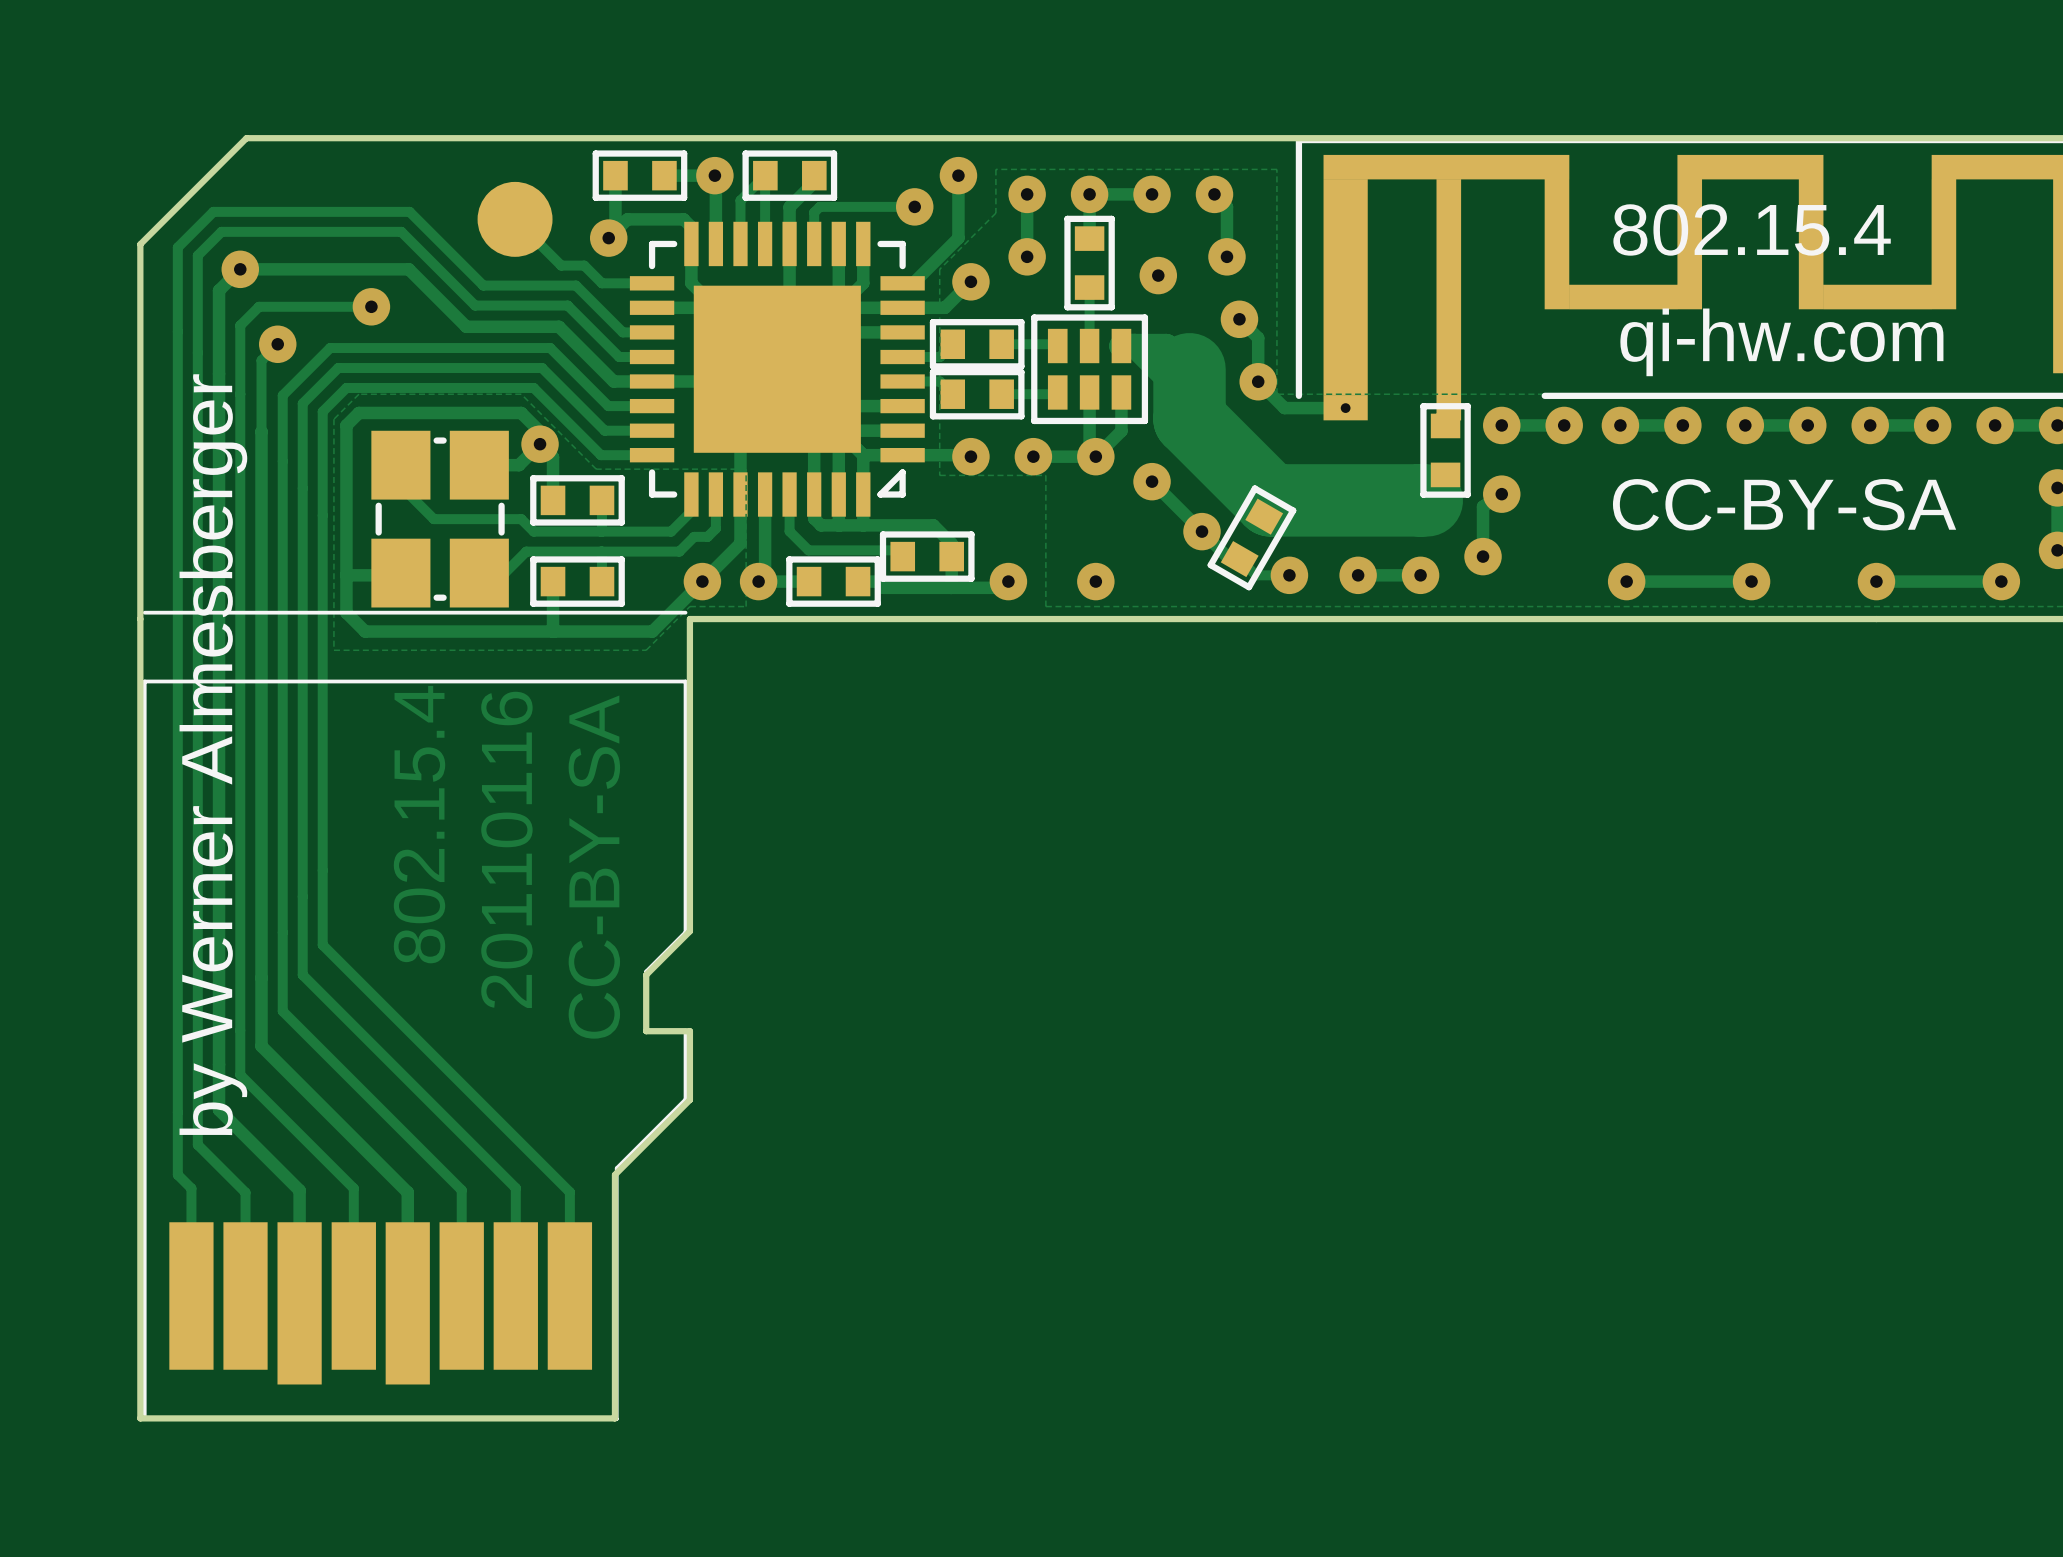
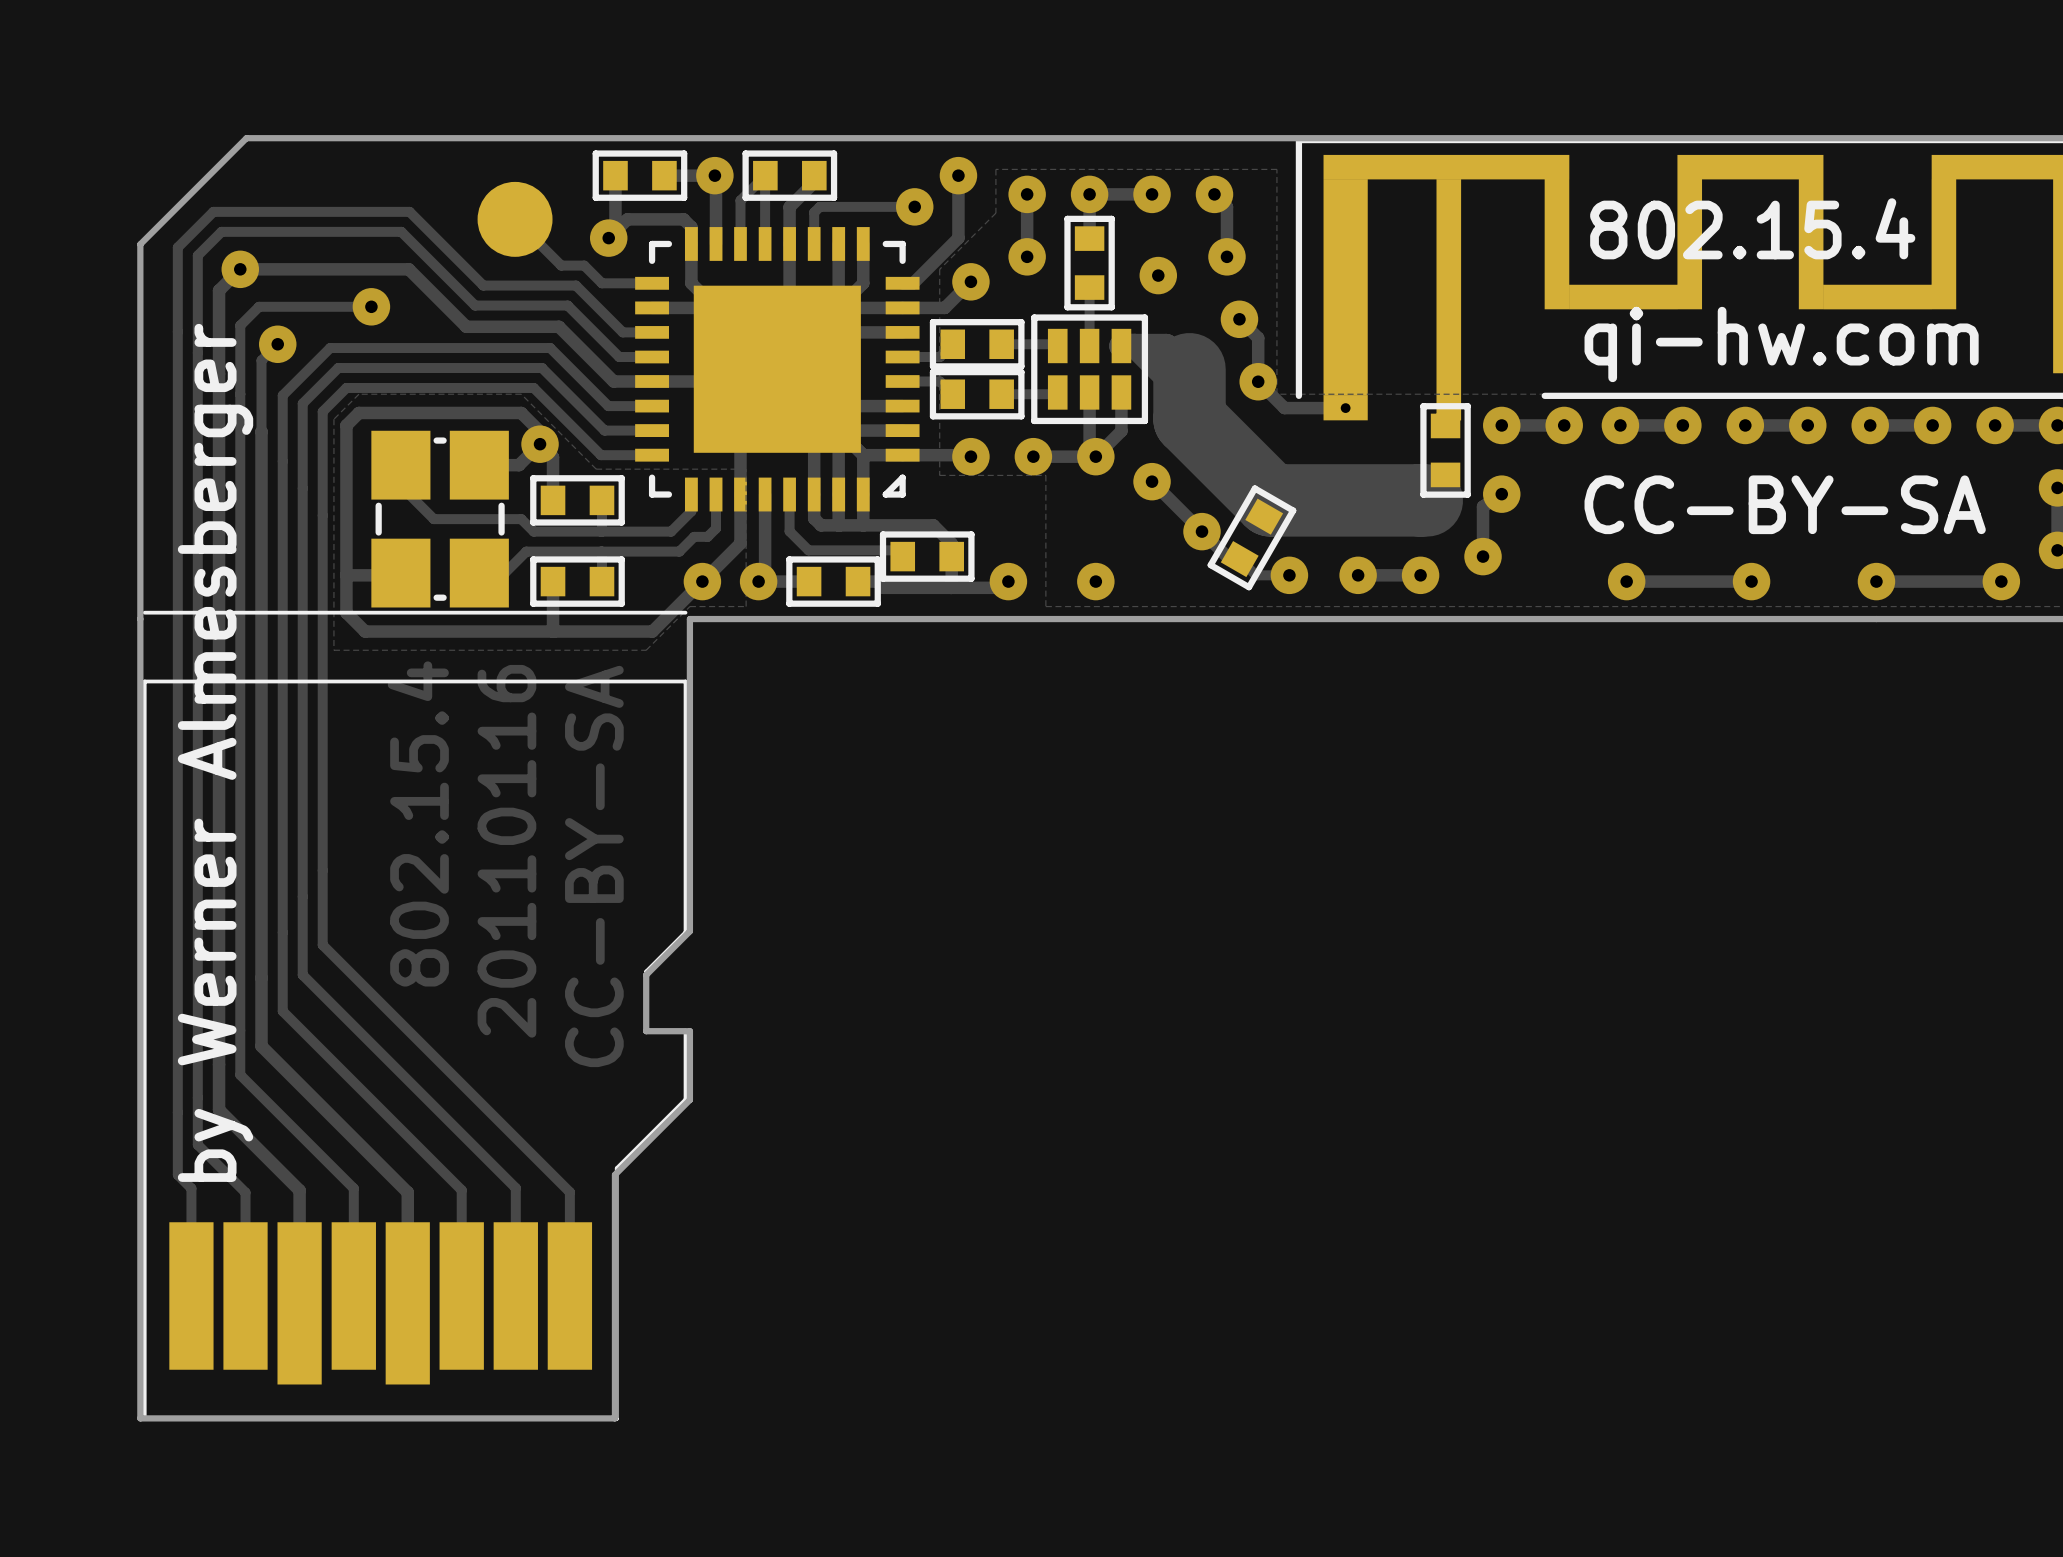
part footprint: [629, 221, 925, 517] -> [635, 227, 920, 512]

